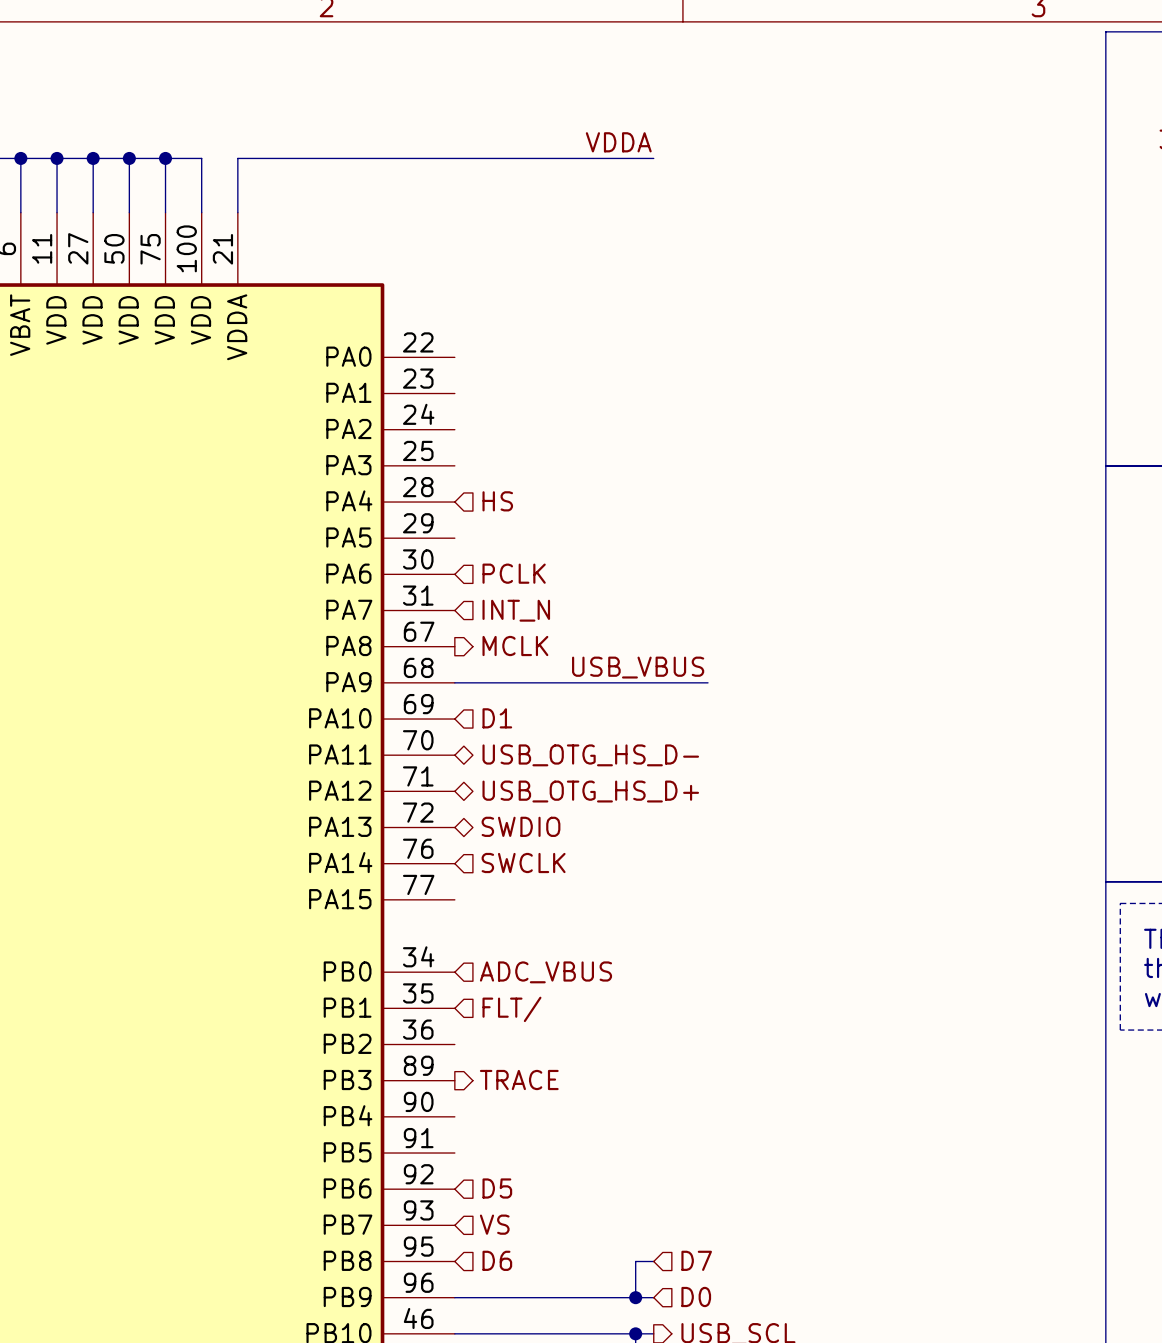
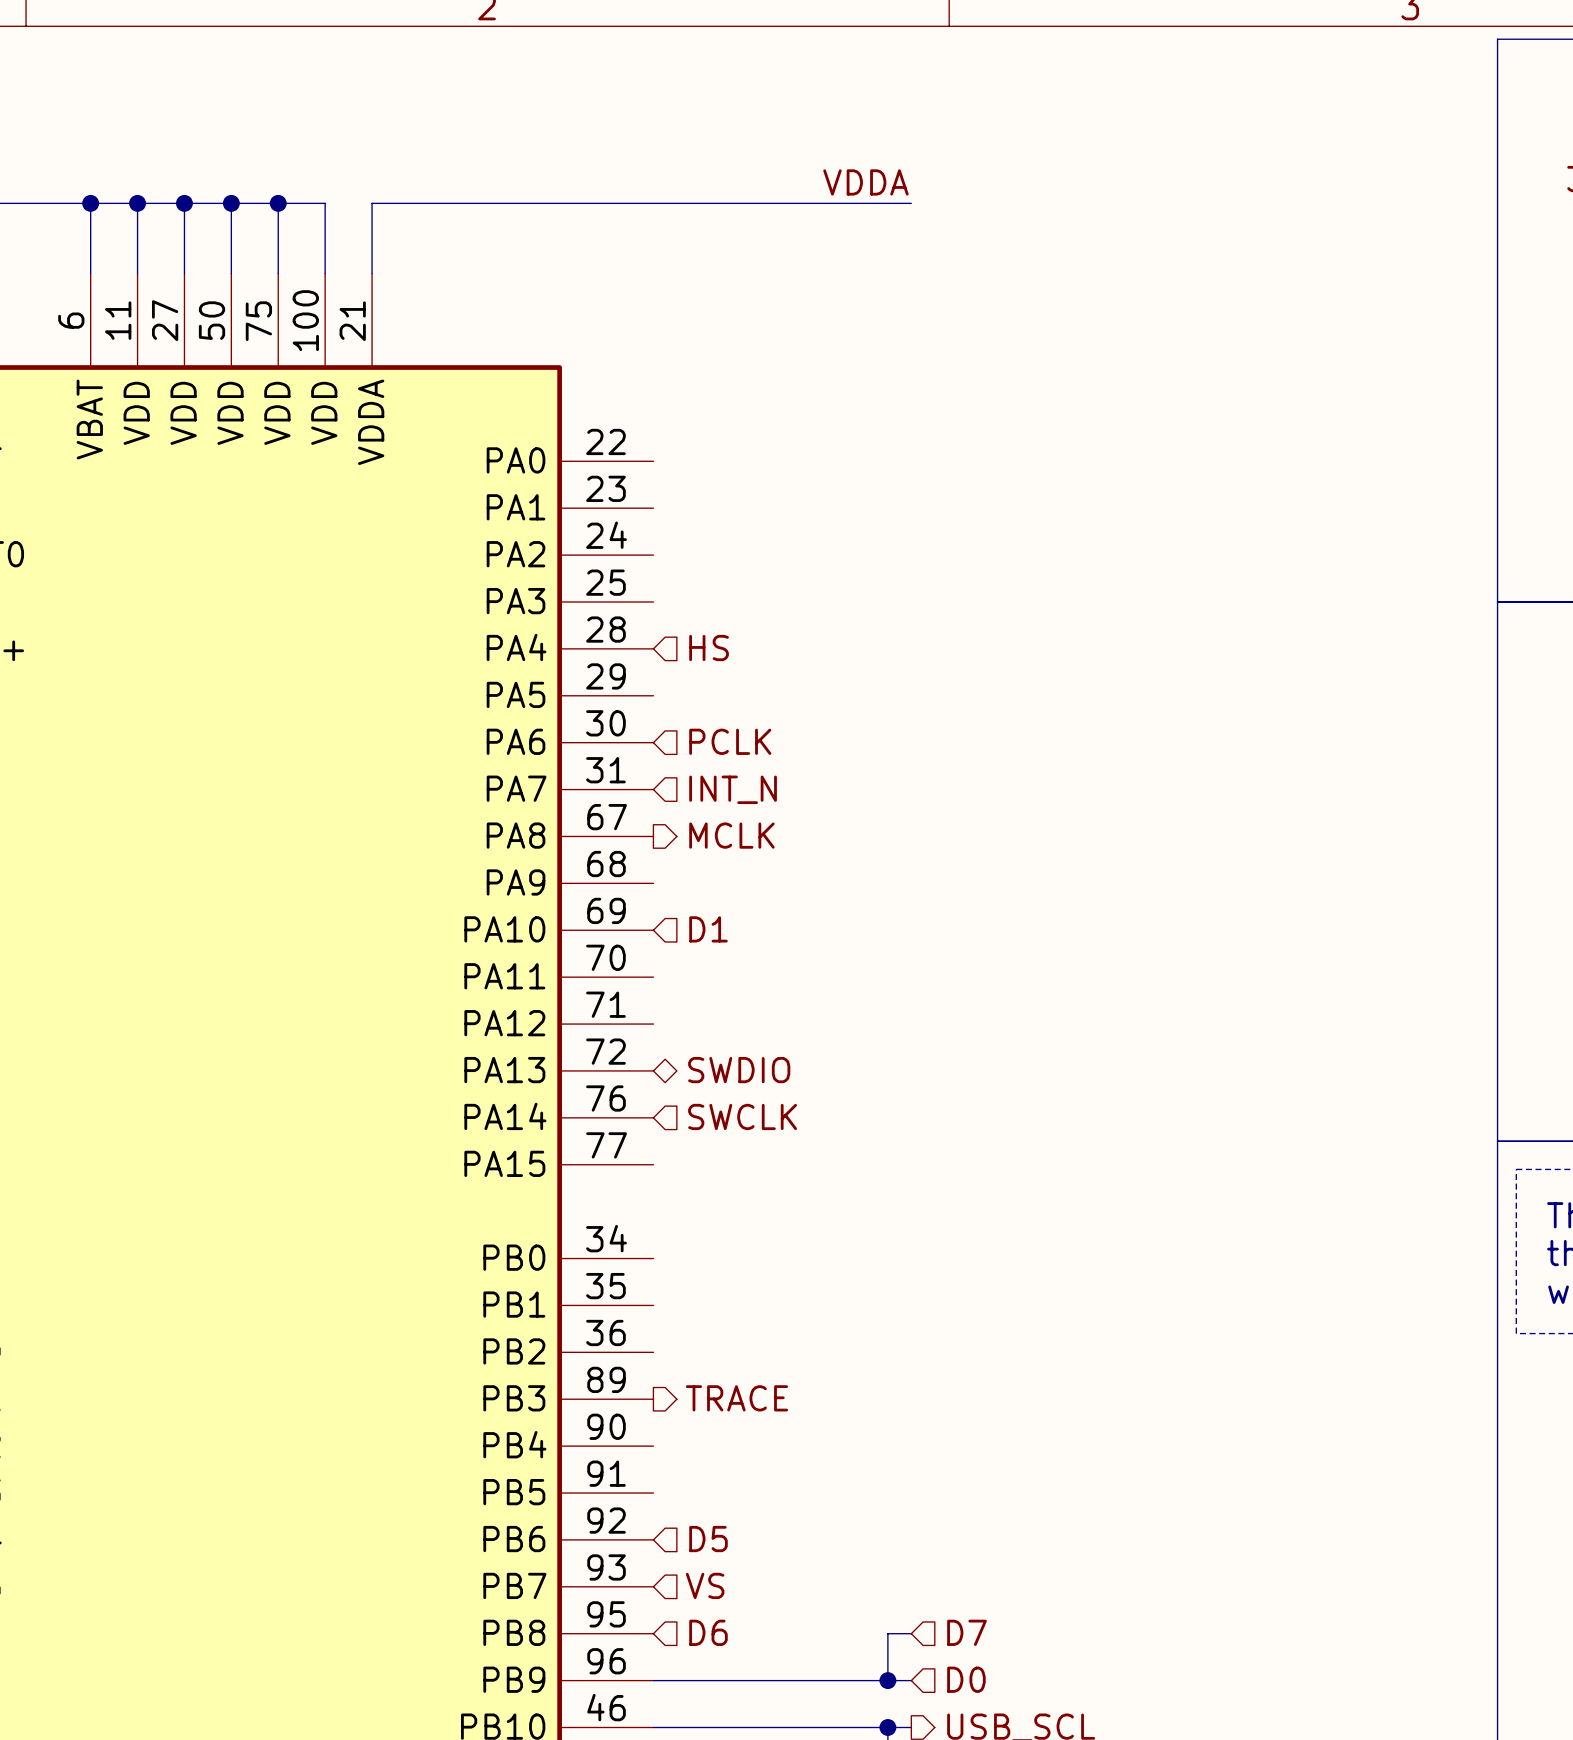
label: USB_VBUS (638, 667) -> none
wire: (454, 682) (708, 682) -> none
hierarchical label: USB_OTG_HS_D- (590, 755) -> none
hierarchical label: USB_OTG_HS_D+ (590, 791) -> none
hierarchical label: ADC_VBUS (545, 972) -> none
hierarchical label: FLT/ (511, 1009) -> none

